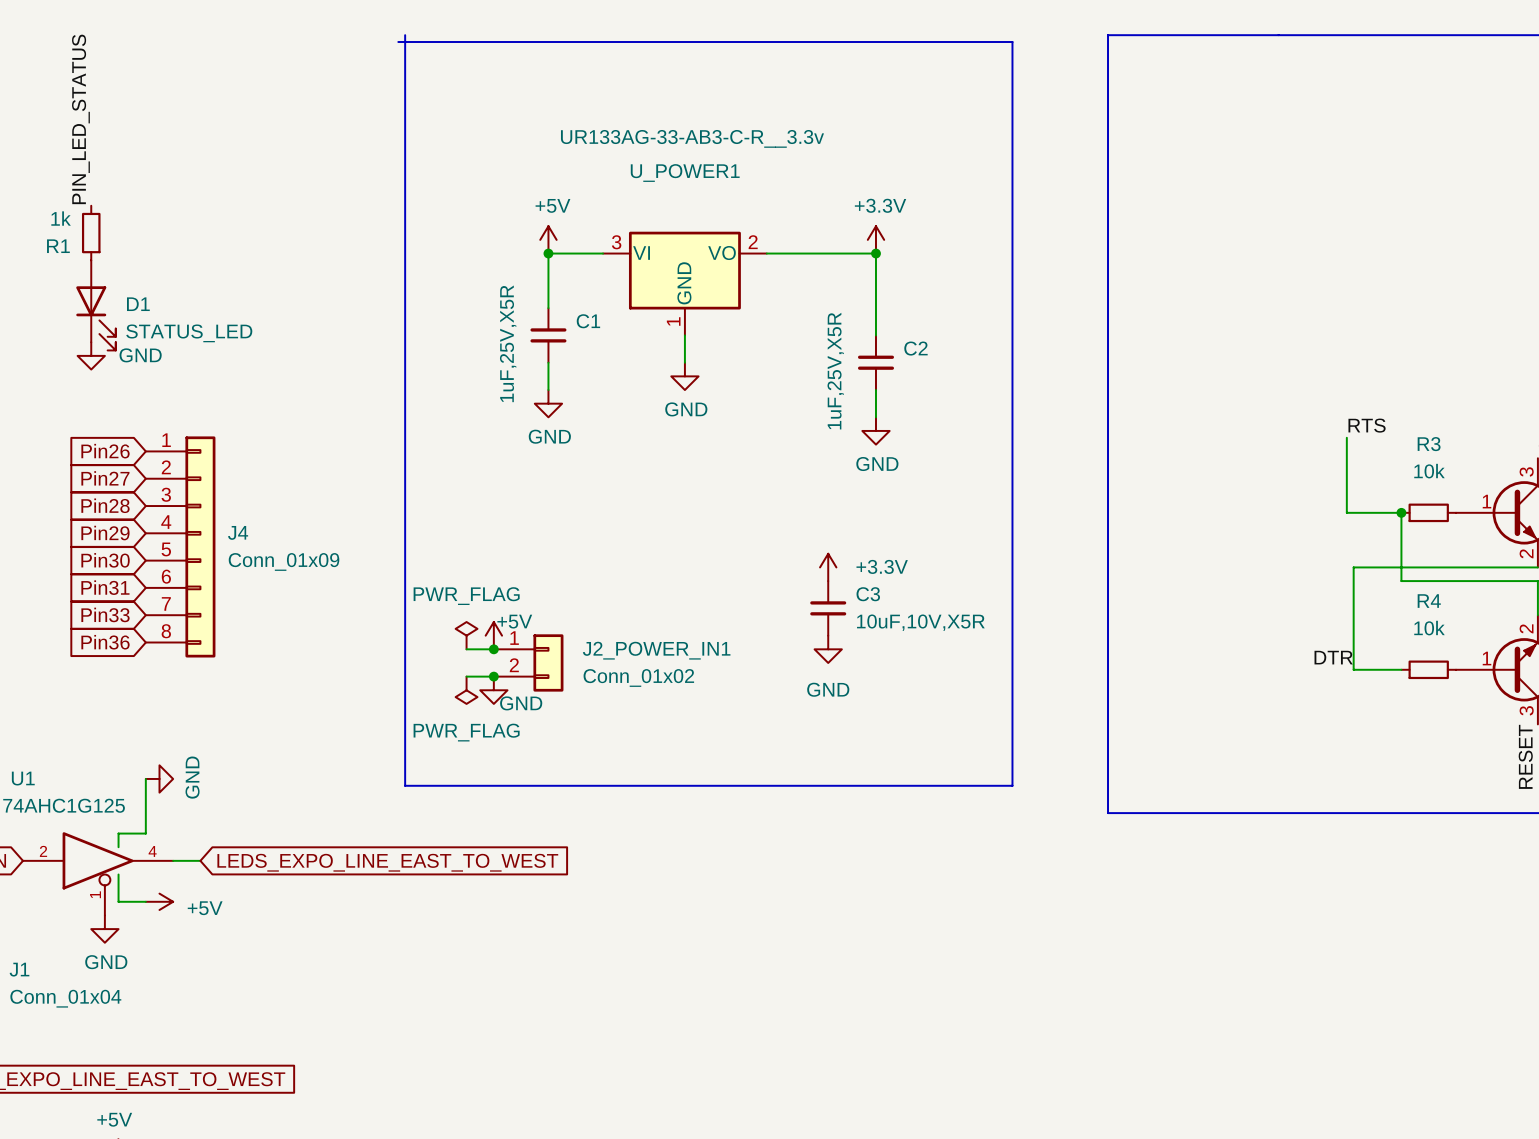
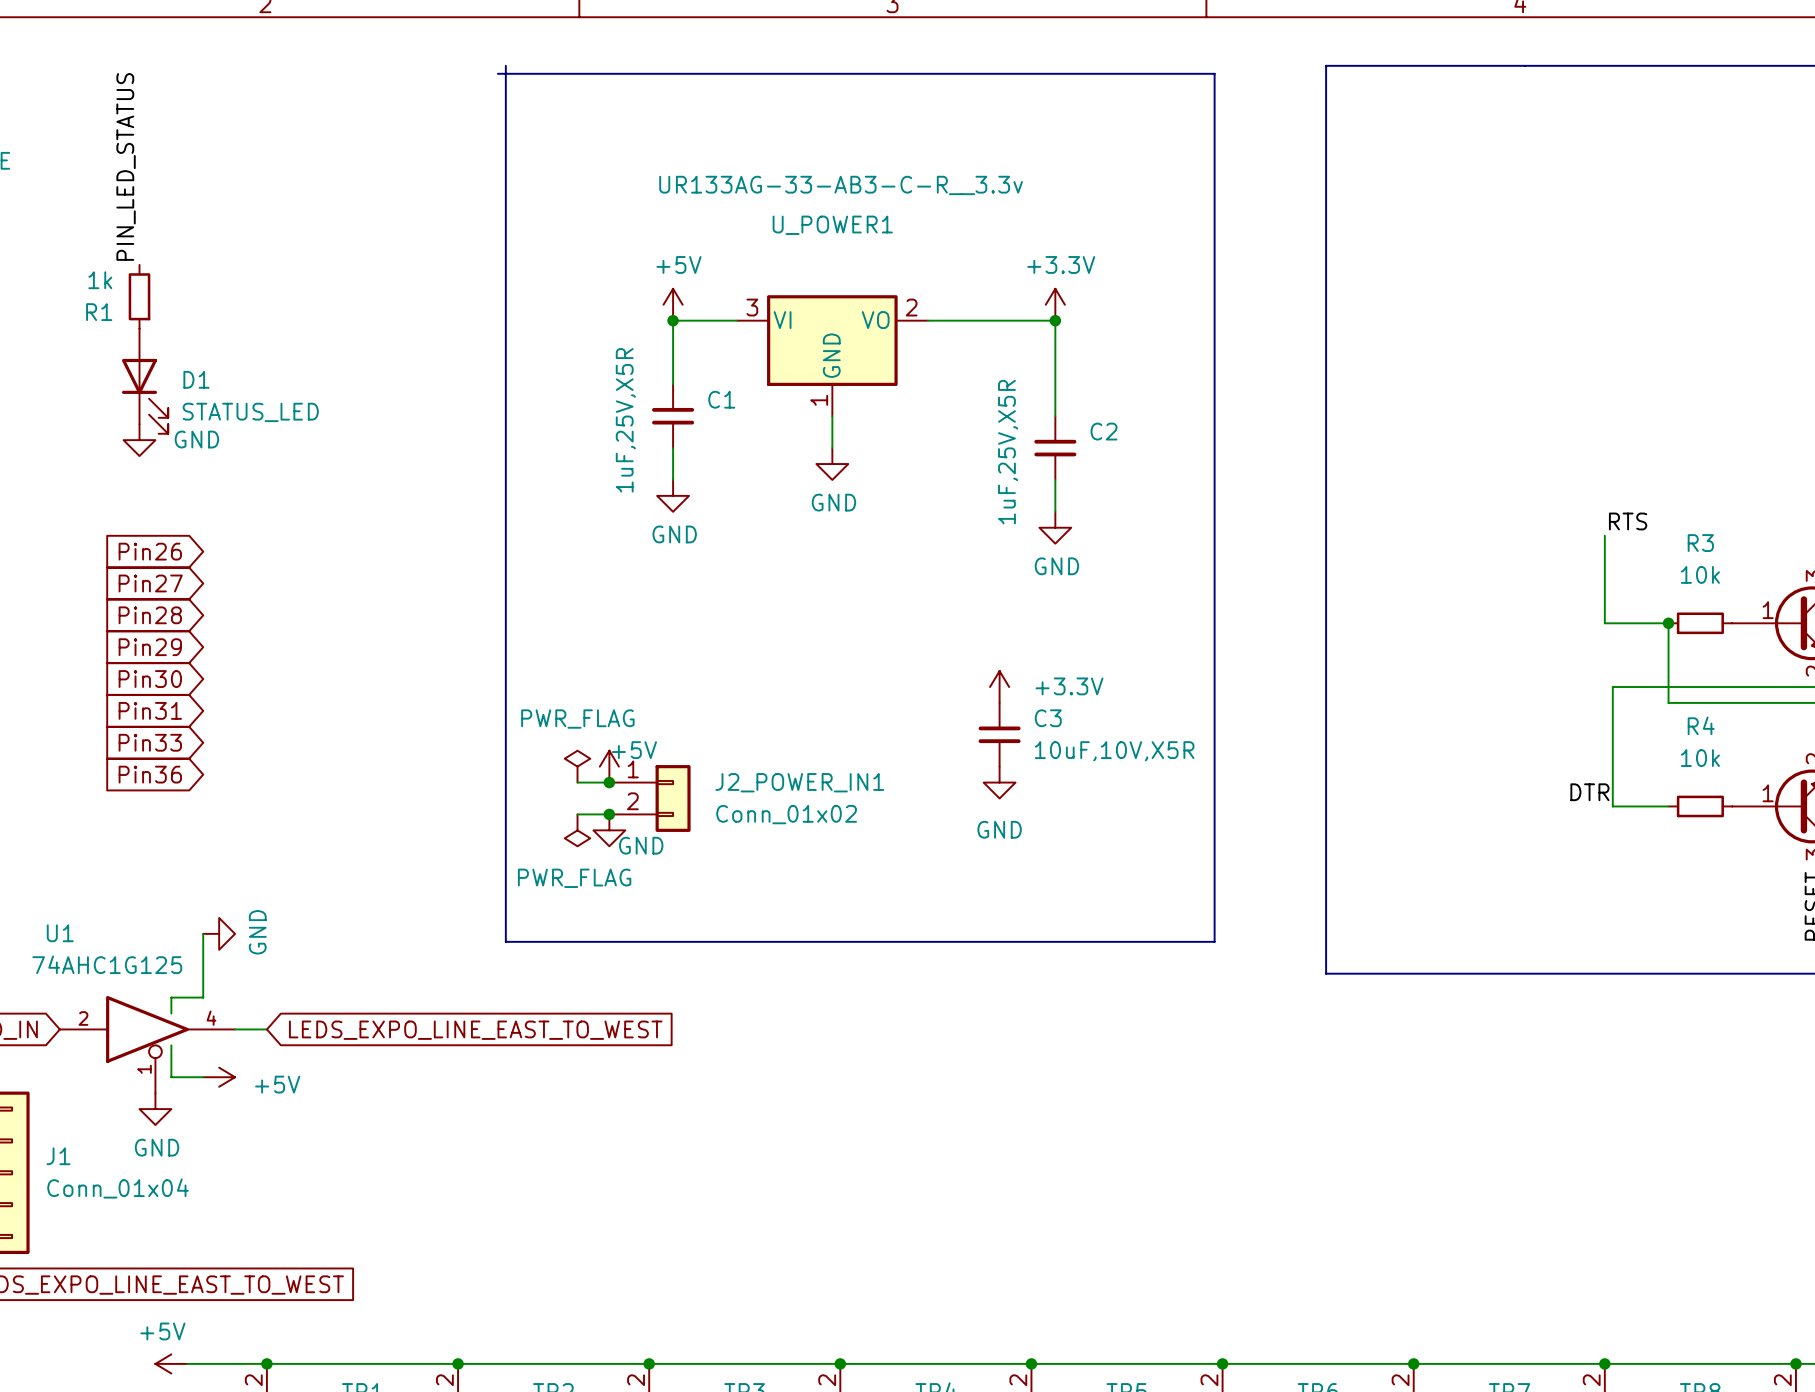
J4: Conn_01x09 (180, 546) -> none

